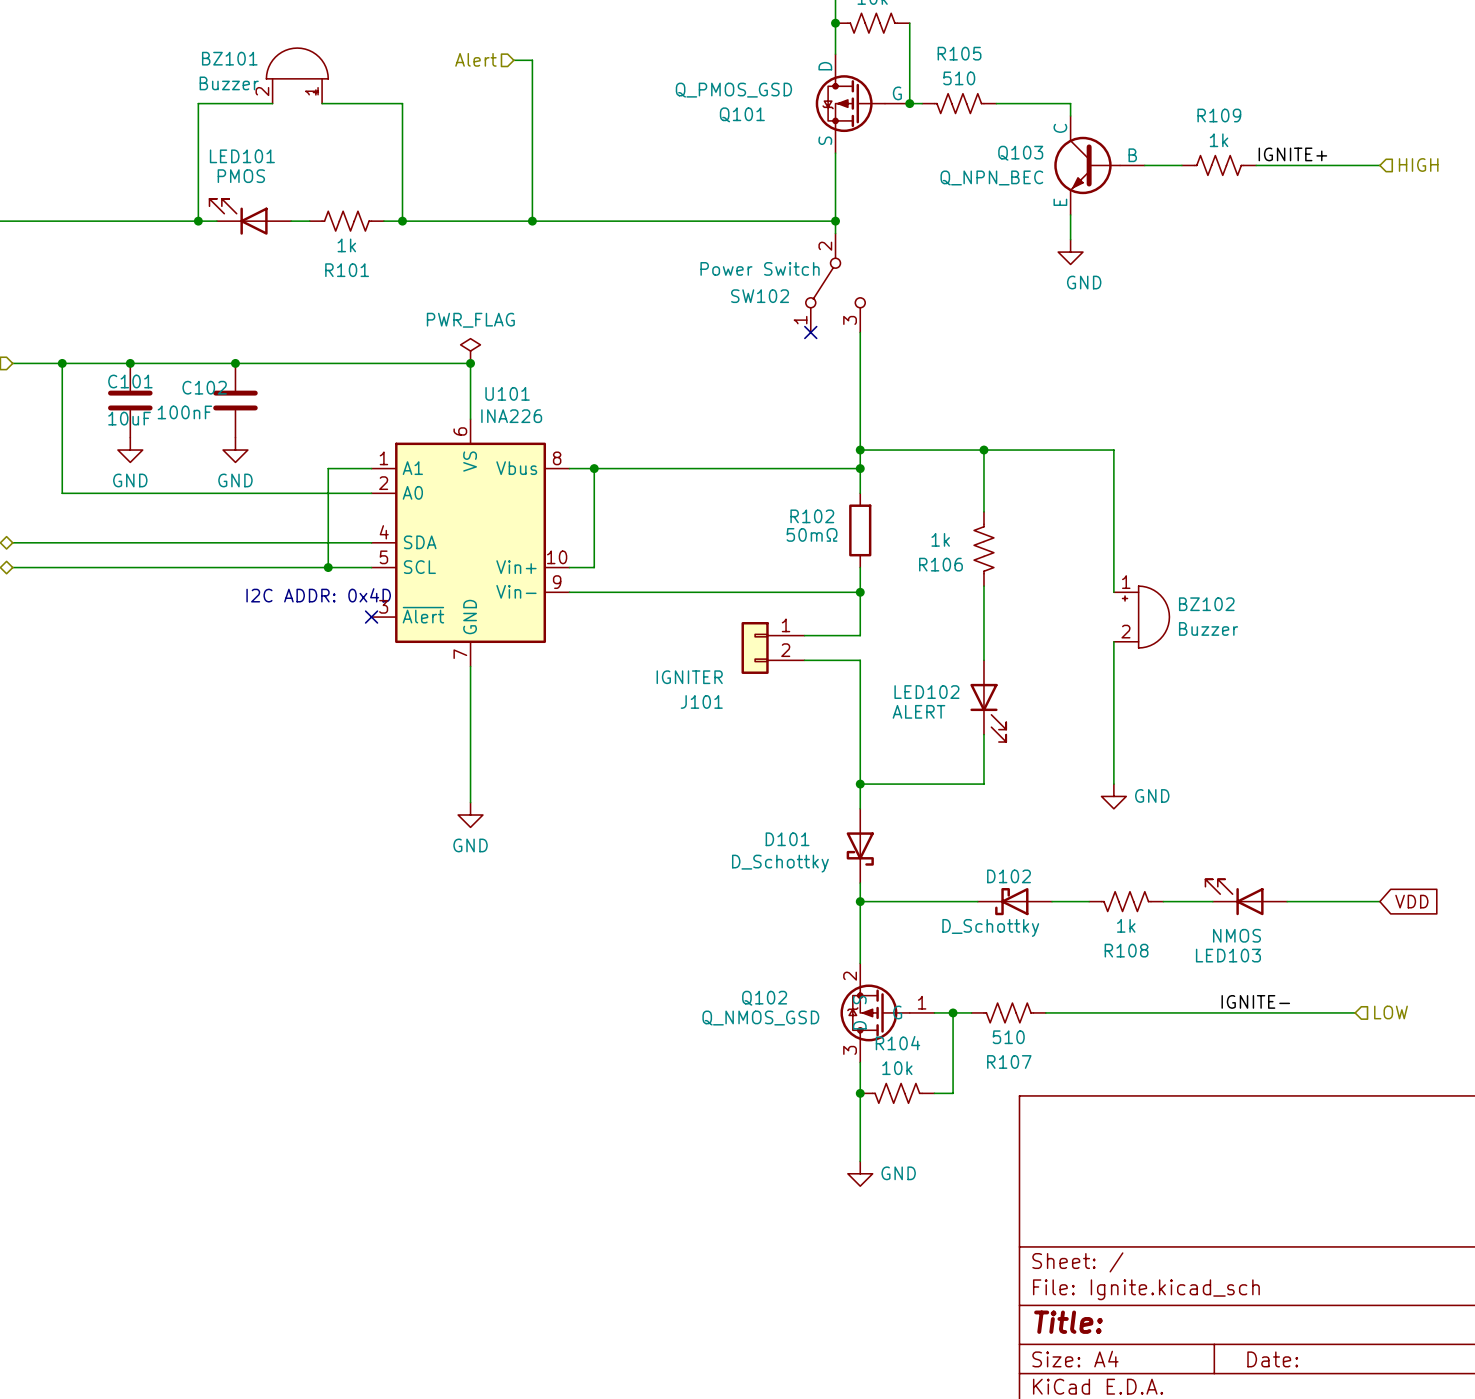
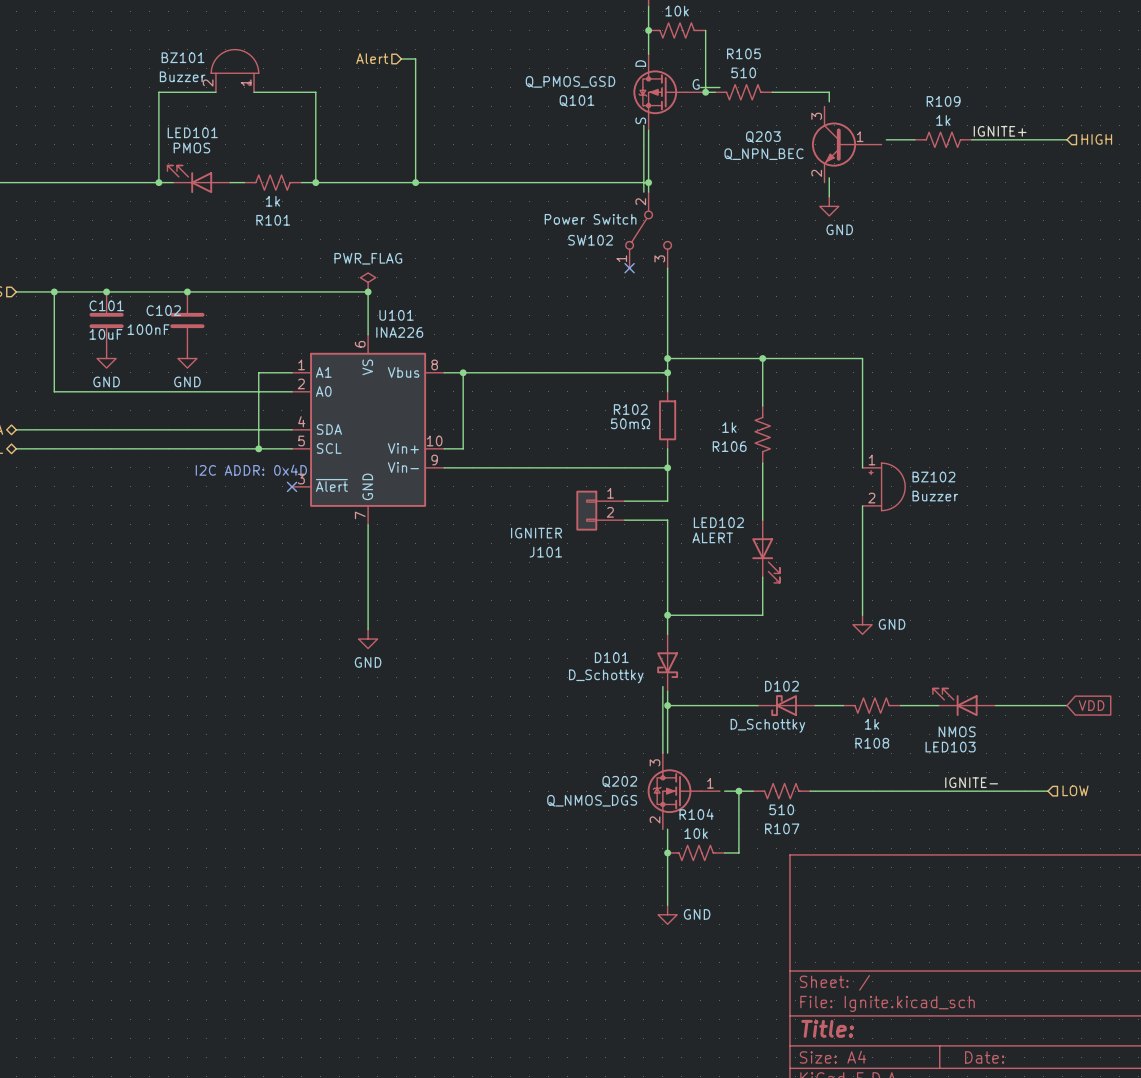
wire: none -> (700, 87) (719, 87)
wire: none -> (643, 125) (643, 192)
Q103: Q_NPN_BEC (1099, 165) -> none
Q203: none -> Q_NPN_BEC (846, 144)
LED102 name position: LED102 (926, 692) -> LED102 (718, 522)
LED102 value position: ALERT (918, 711) -> ALERT (712, 537)
wire: none -> (662, 686) (662, 753)
Q202: none -> Q_NMOS_DGS (683, 791)
Q102: Q_NMOS_GSD (887, 1012) -> none

